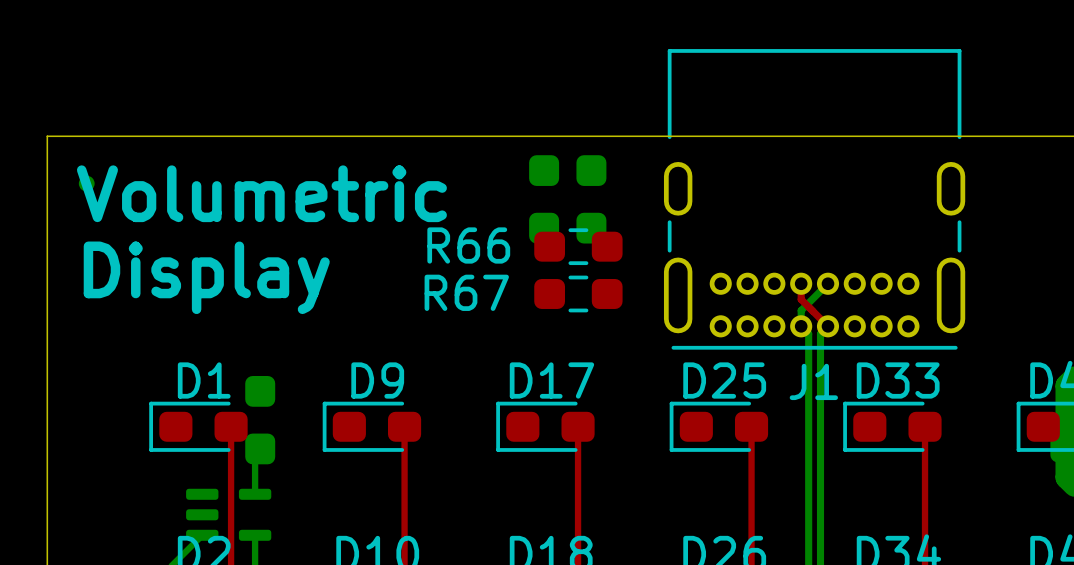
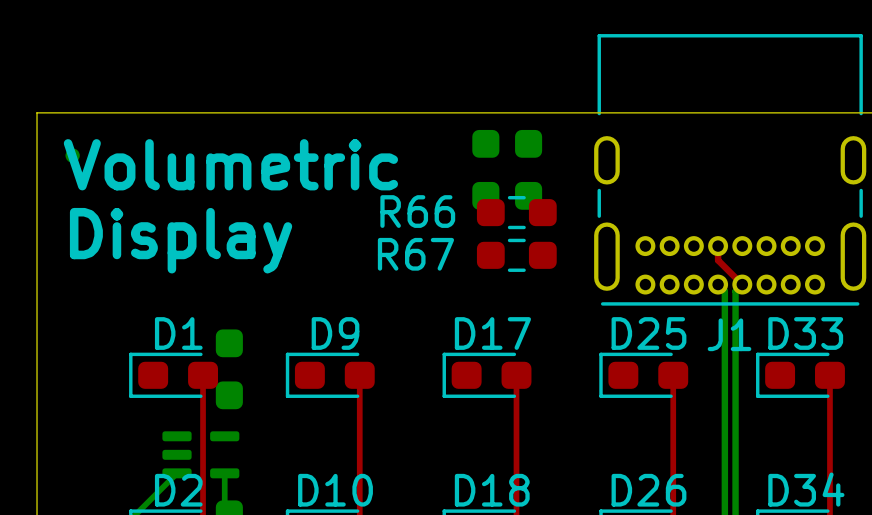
bottom track: (827, 283) (801, 310) (801, 326) -> none
bottom track: (260, 448) (255, 454) (255, 494) -> none

